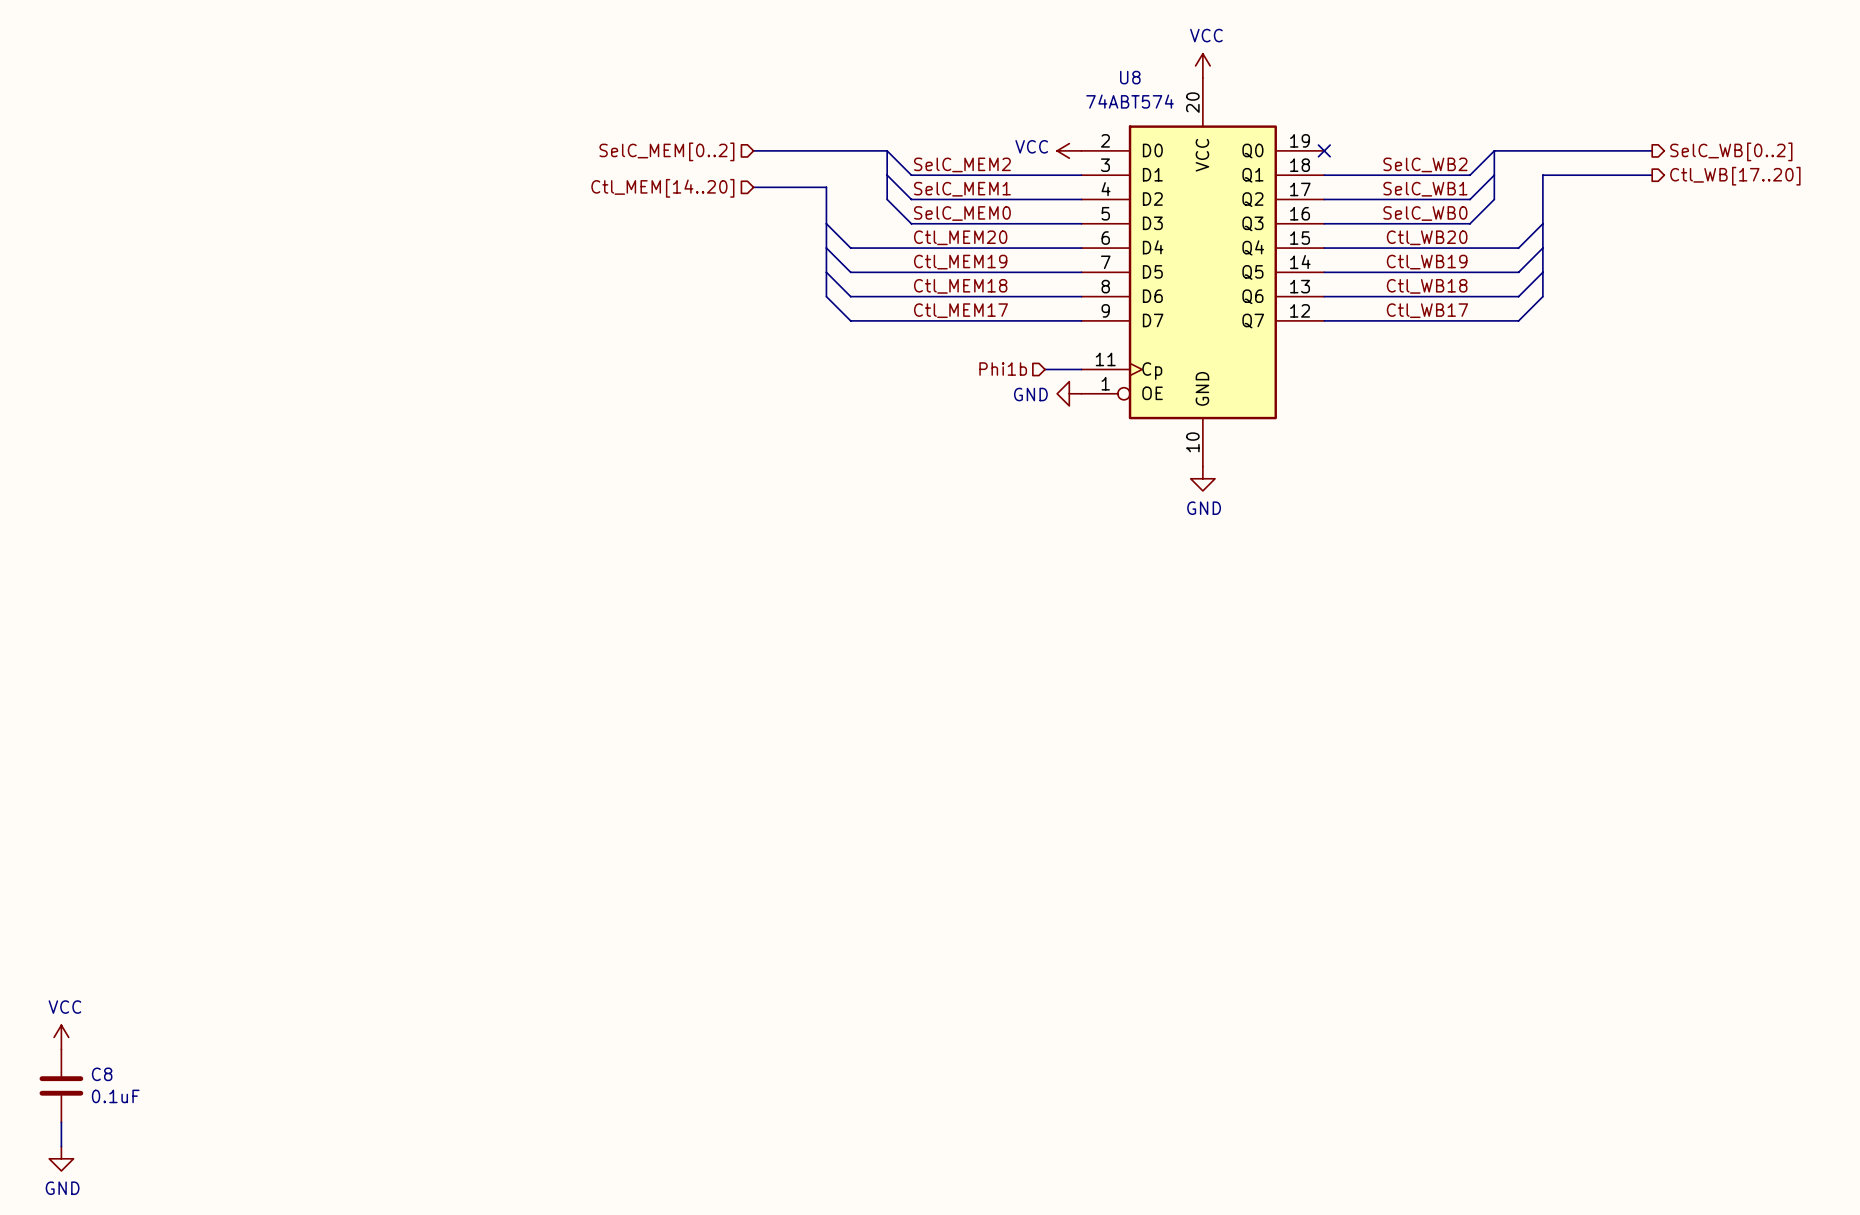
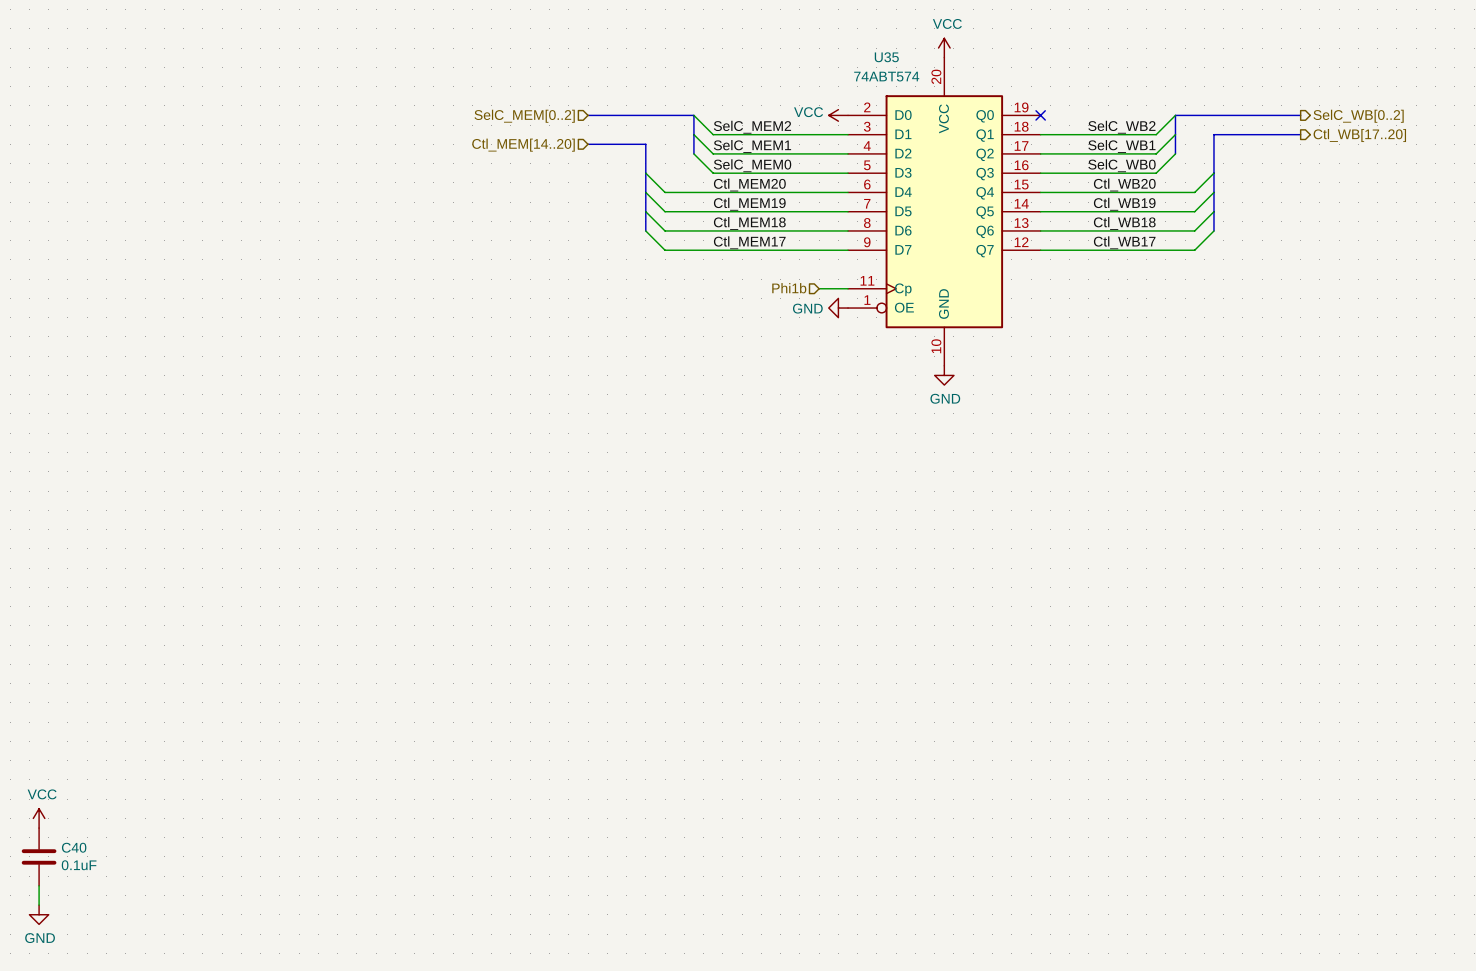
U8 name: U8 (1130, 77) -> U35 (886, 57)
C8 name: C8 (102, 1074) -> C40 (74, 847)

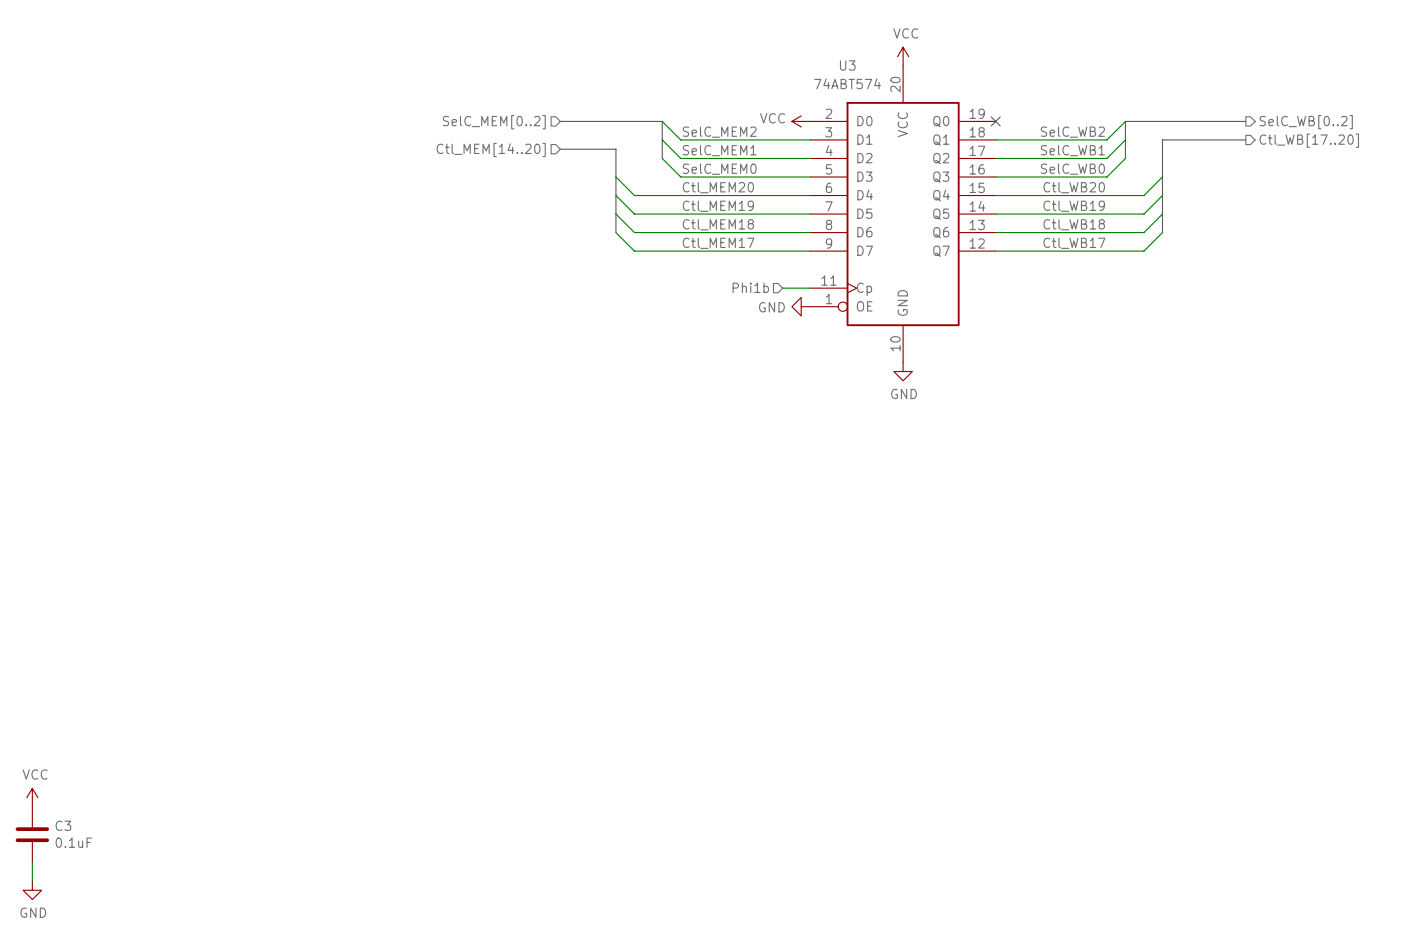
U35 name: U35 (886, 57) -> U3 (847, 65)
C40 name: C40 (74, 847) -> C3 (63, 825)

